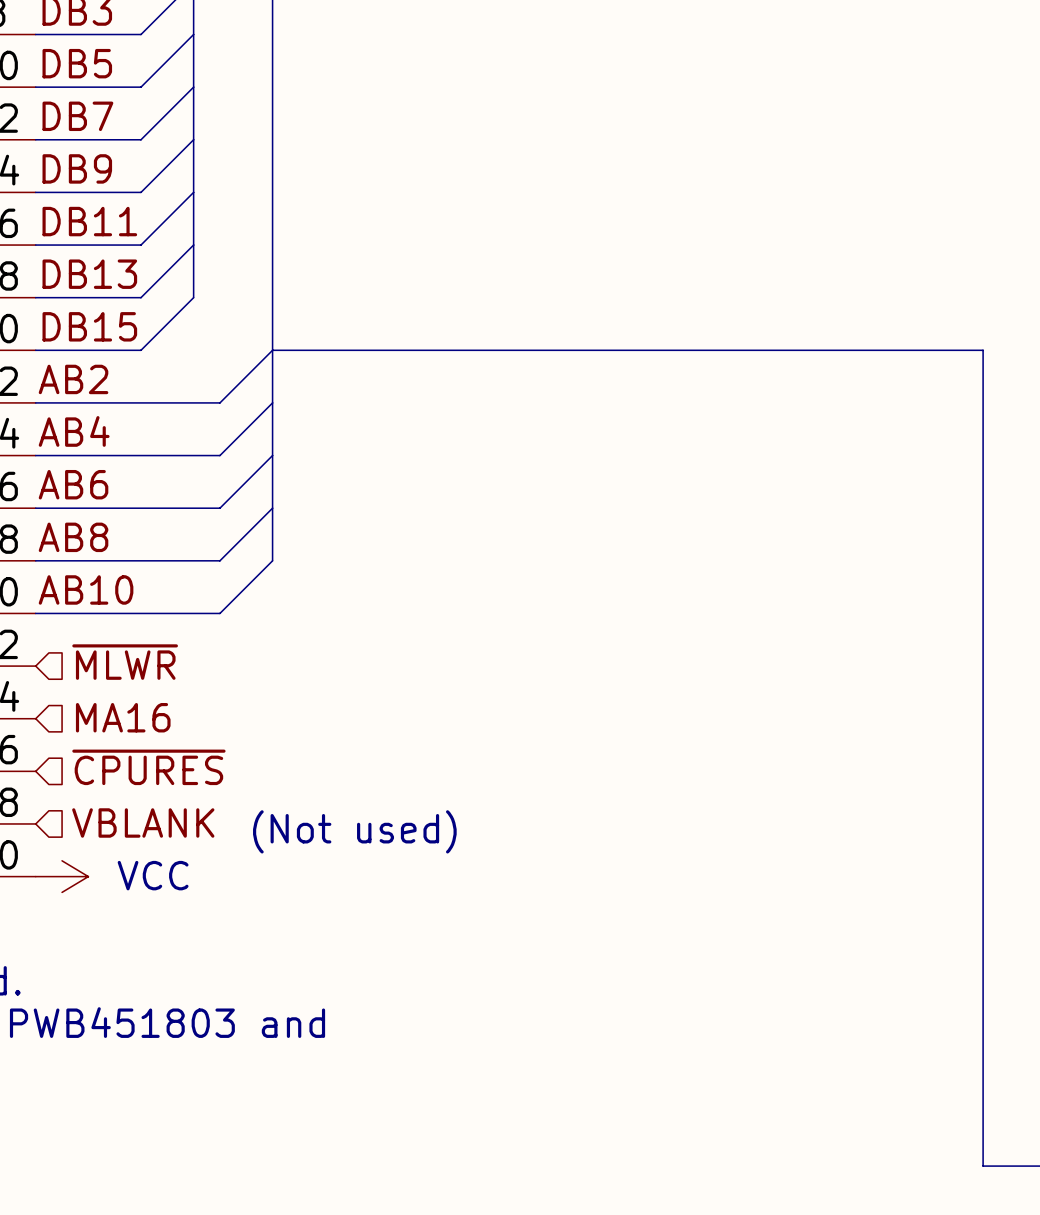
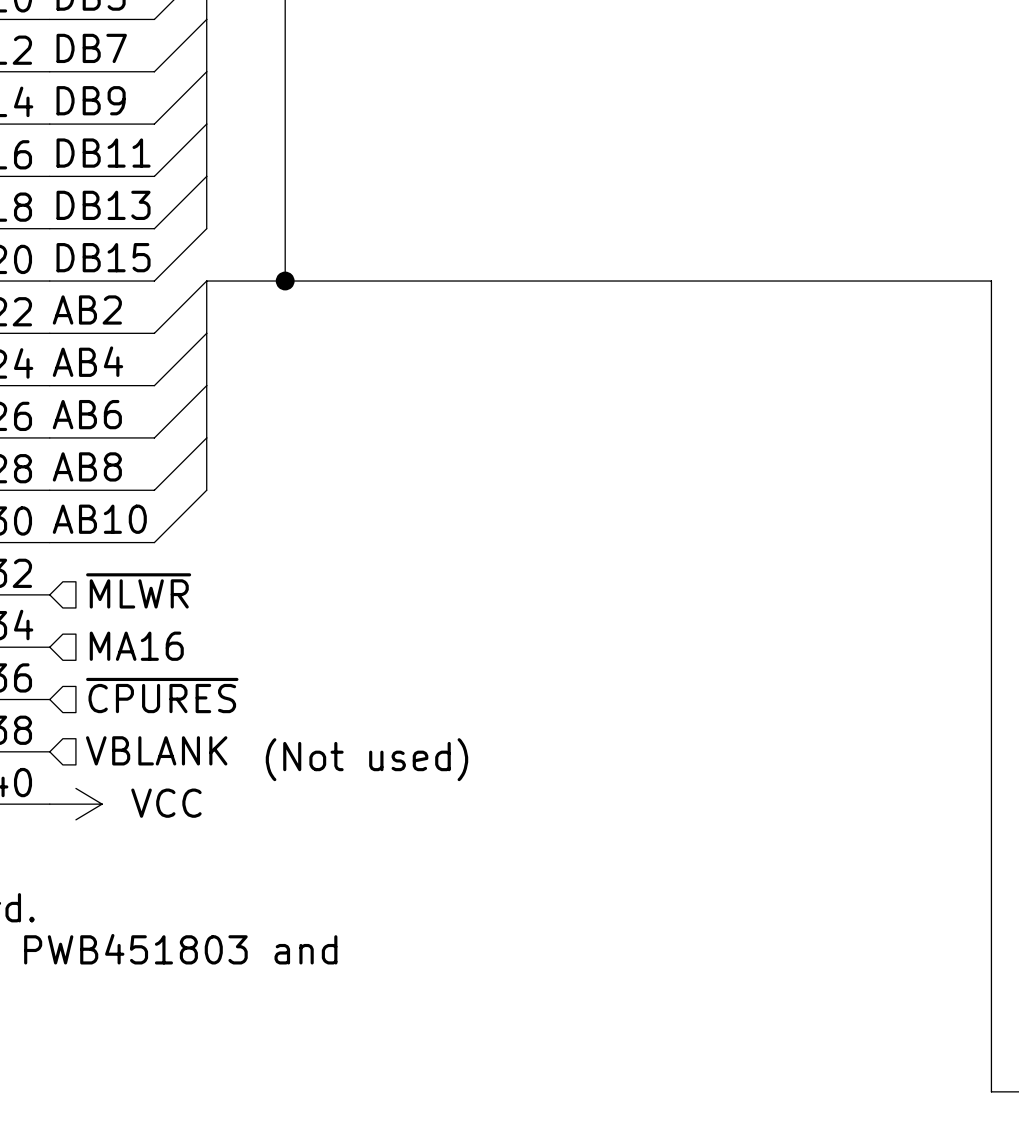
wire: (272, 350) (219, 402) (141, 402) -> (206, 281) (154, 333)
bus: (272, 350) (272, 560) -> (285, 281) (206, 281) (206, 490)
junction: none -> (285, 281)
wire: (272, 402) (219, 455) (141, 455) -> (206, 333) (154, 385)
wire: (272, 455) (219, 508) (141, 508) -> (206, 385) (154, 437)
wire: (272, 508) (219, 560) (141, 560) -> (206, 437) (154, 490)
wire: (272, 560) (219, 613) (141, 613) -> (206, 490) (154, 542)

